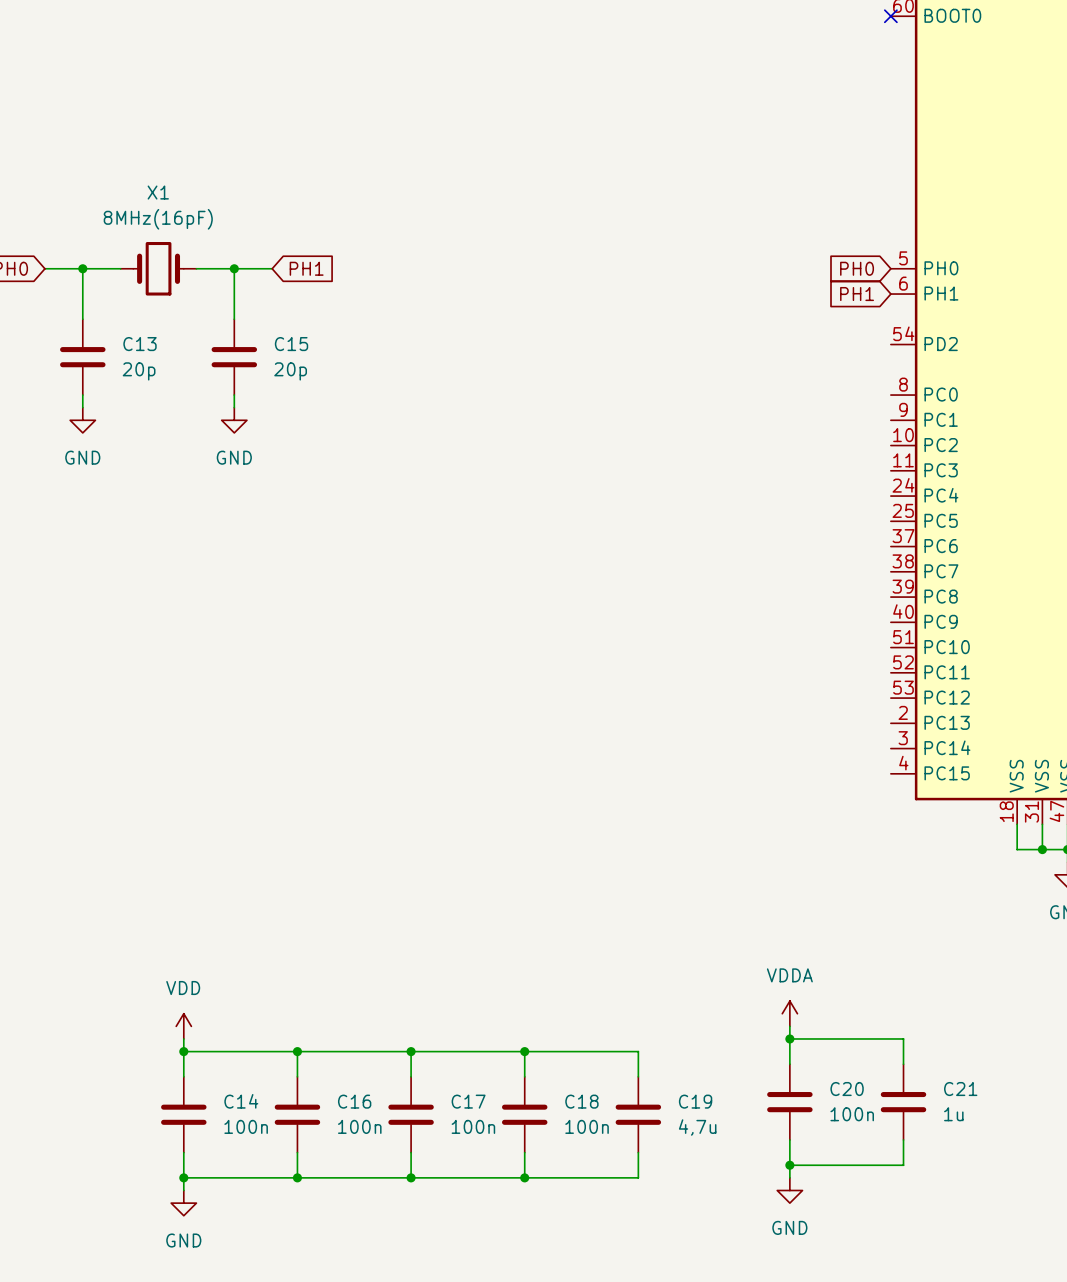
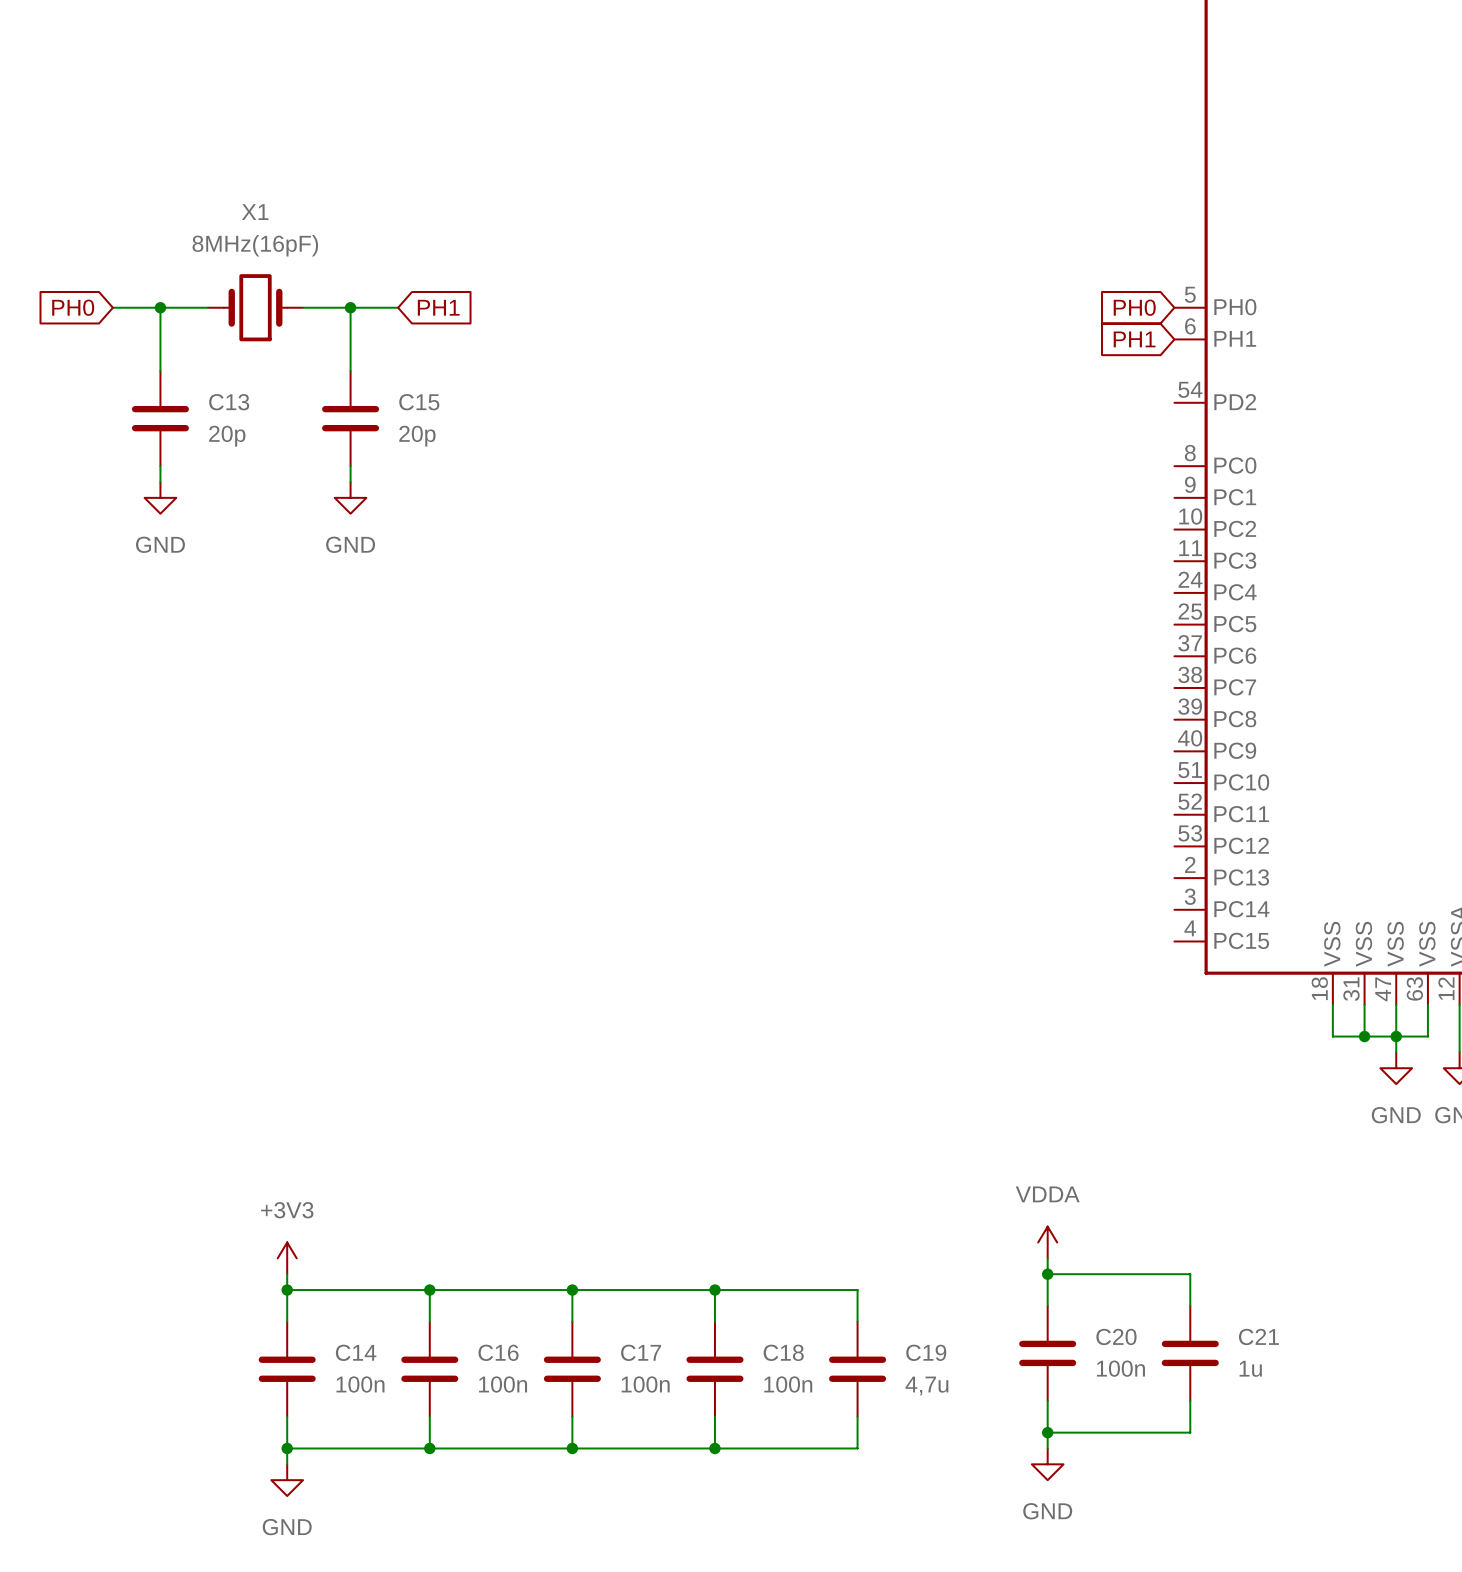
power symbol: VDD (183, 1026) -> +3V3 (287, 1258)

